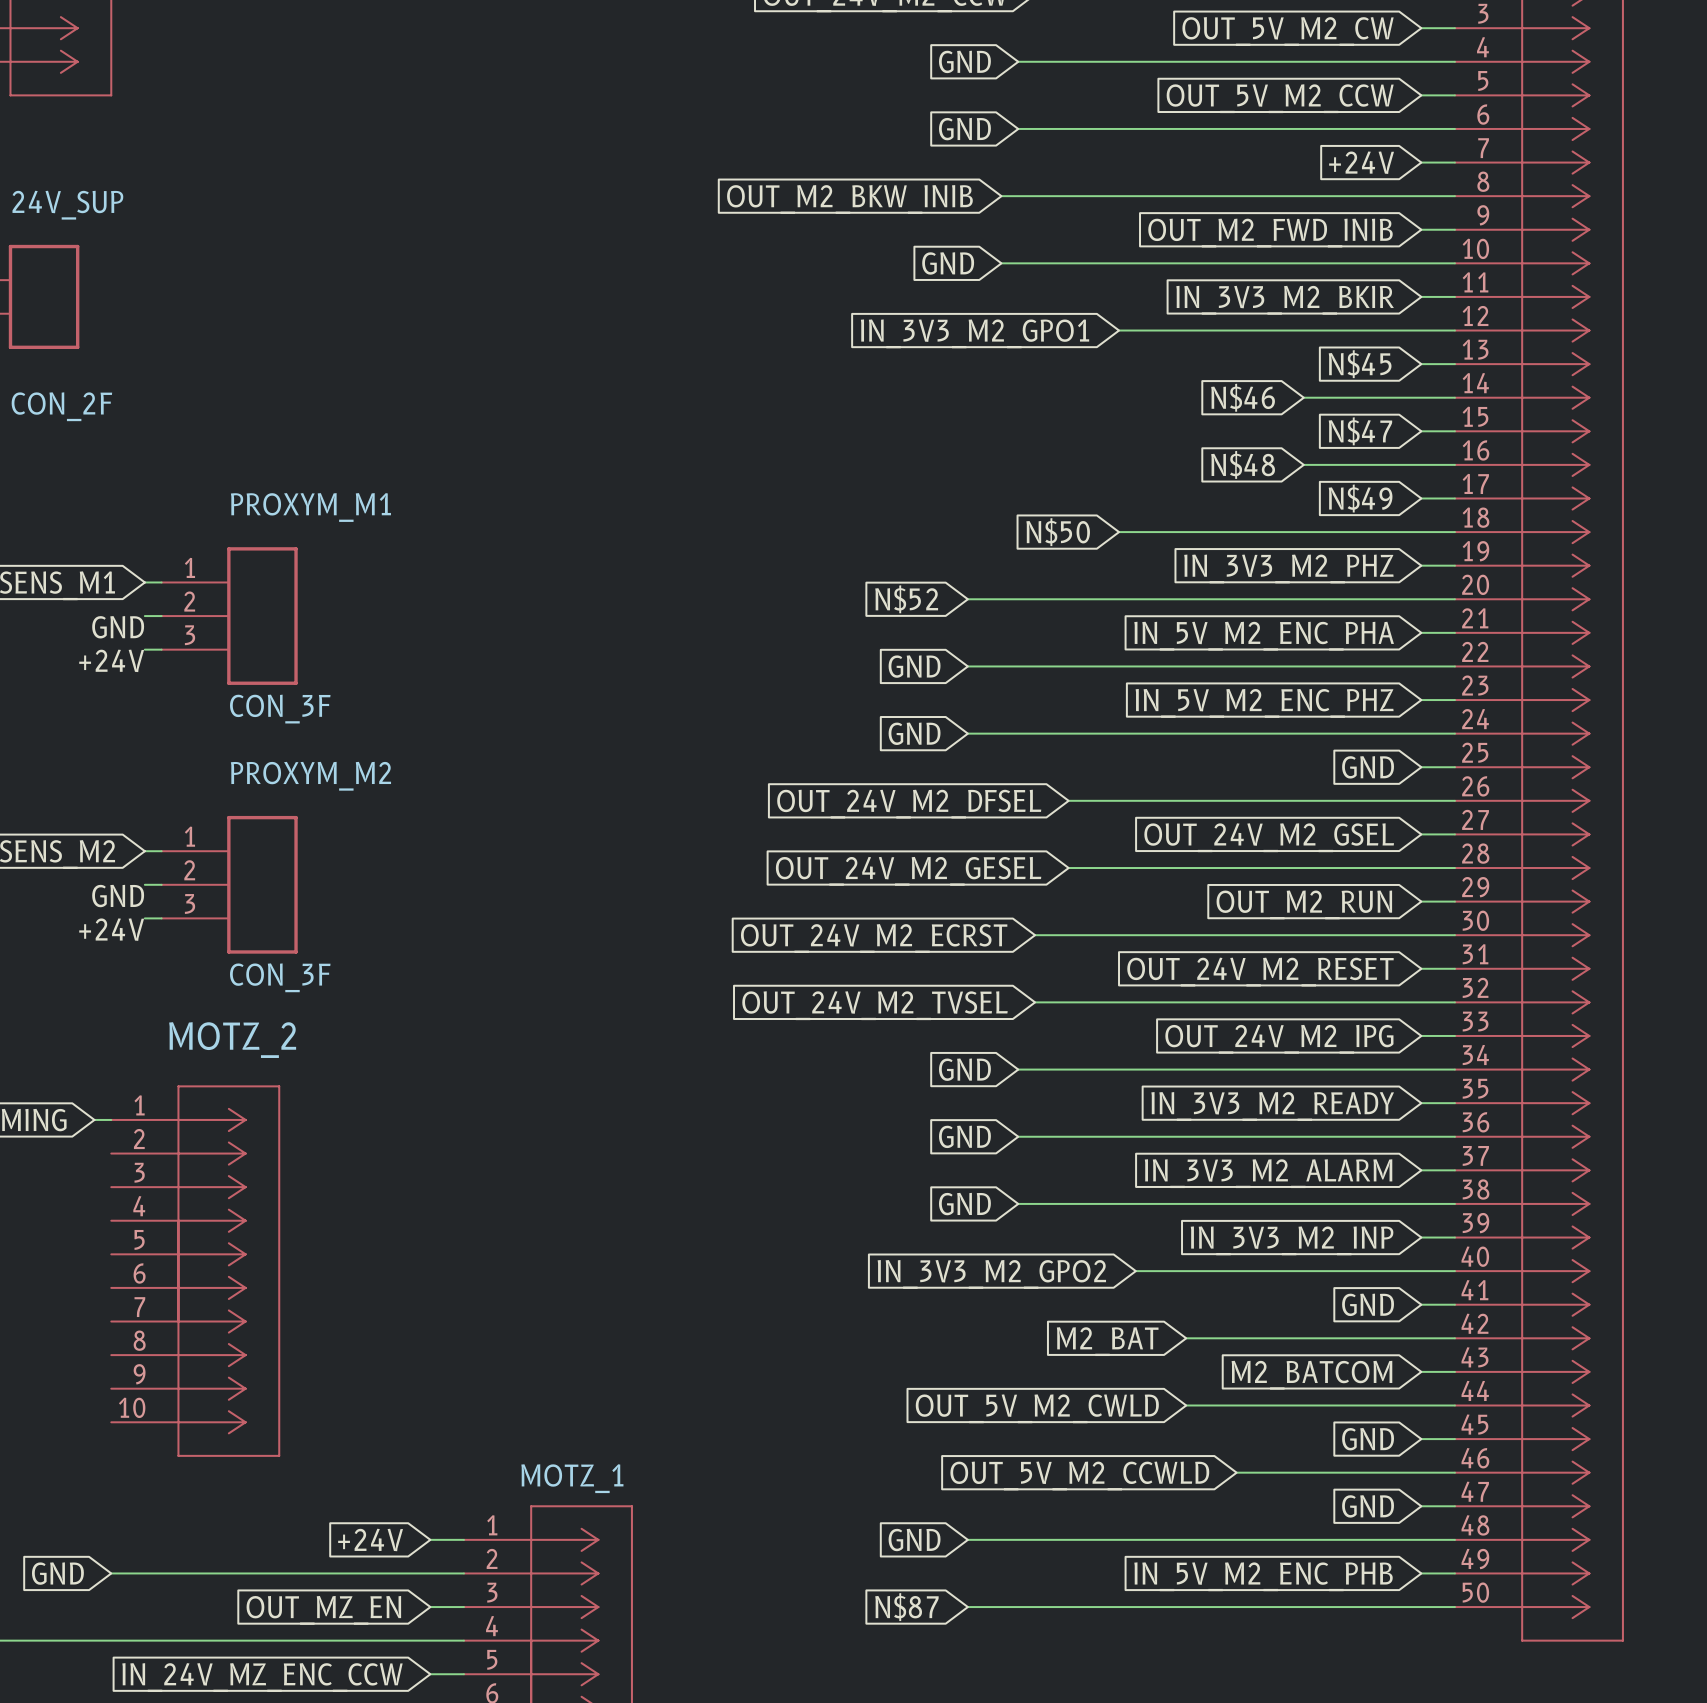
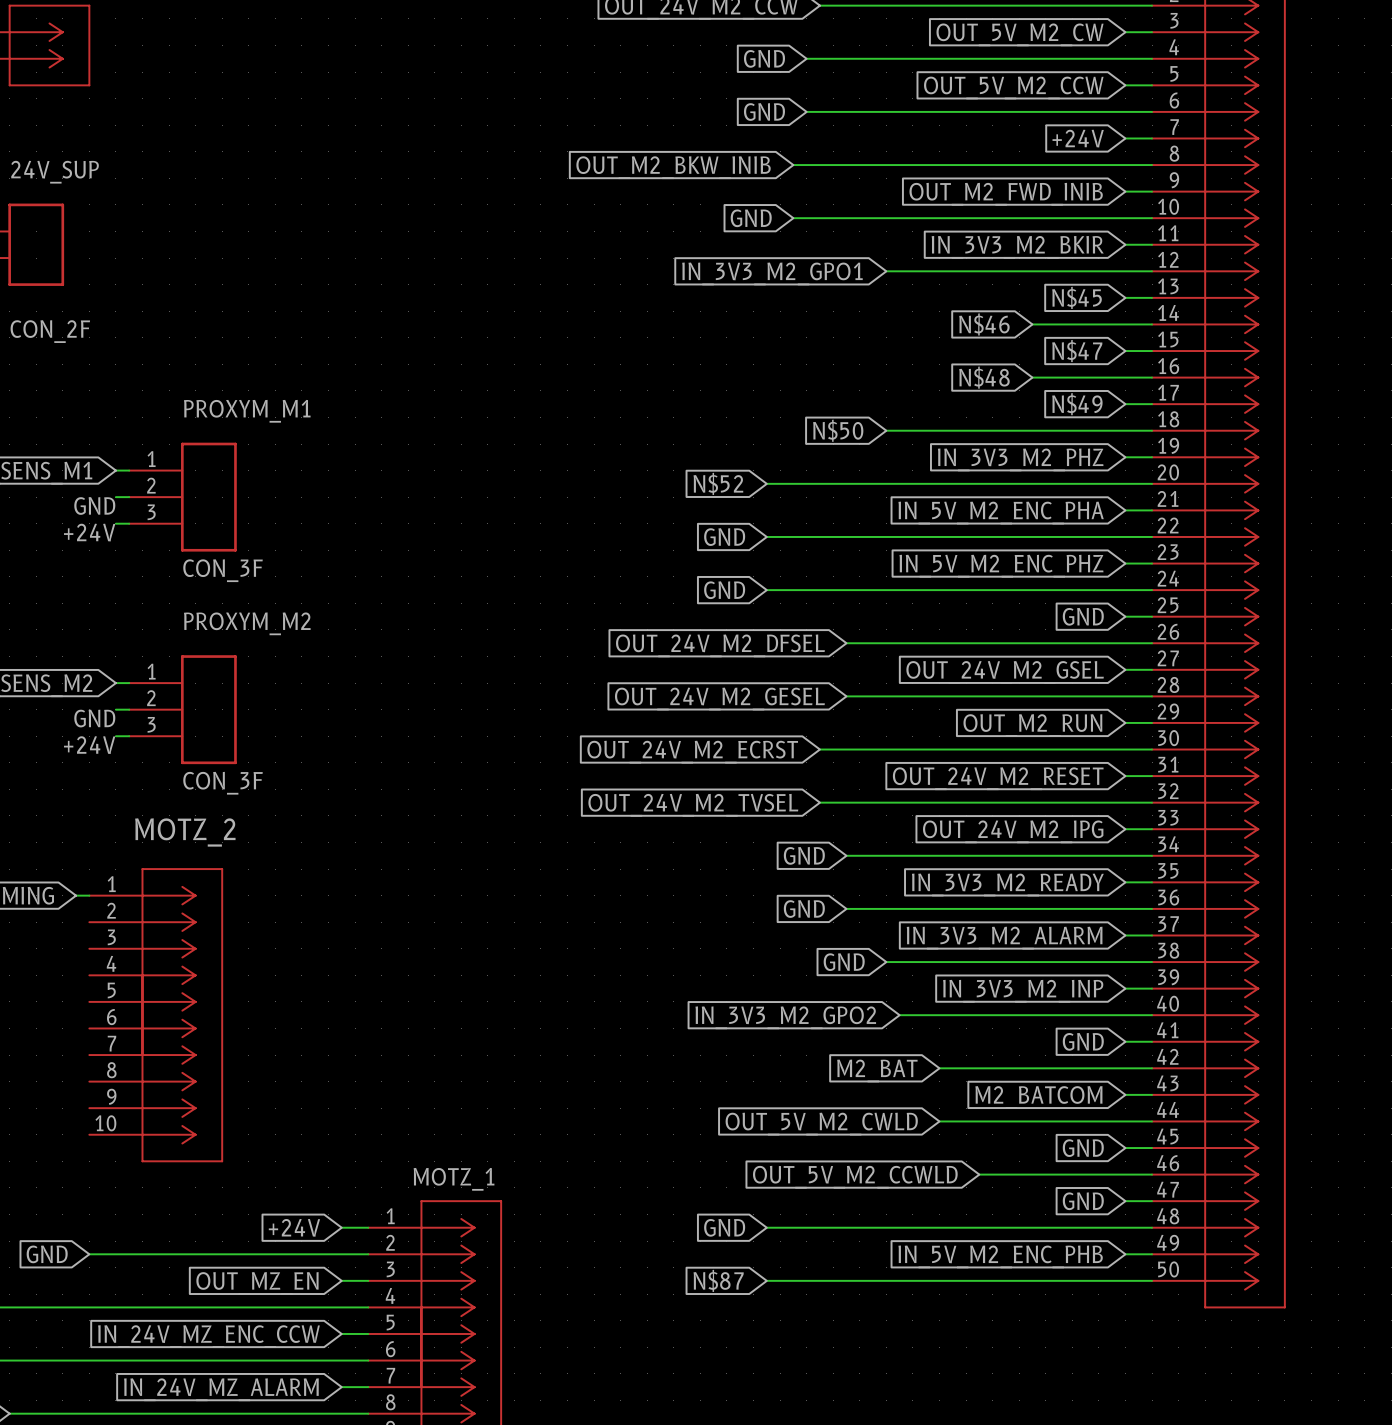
global label position: GND (964, 1069) -> GND (804, 855)
wire: (1018, 1069) (1068, 1069) -> none
global label position: GND (964, 1136) -> GND (804, 909)
wire: (1018, 1136) (1068, 1136) -> none
wire: (1018, 1203) (1119, 1203) -> none
global label position: GND (964, 1204) -> GND (844, 962)

